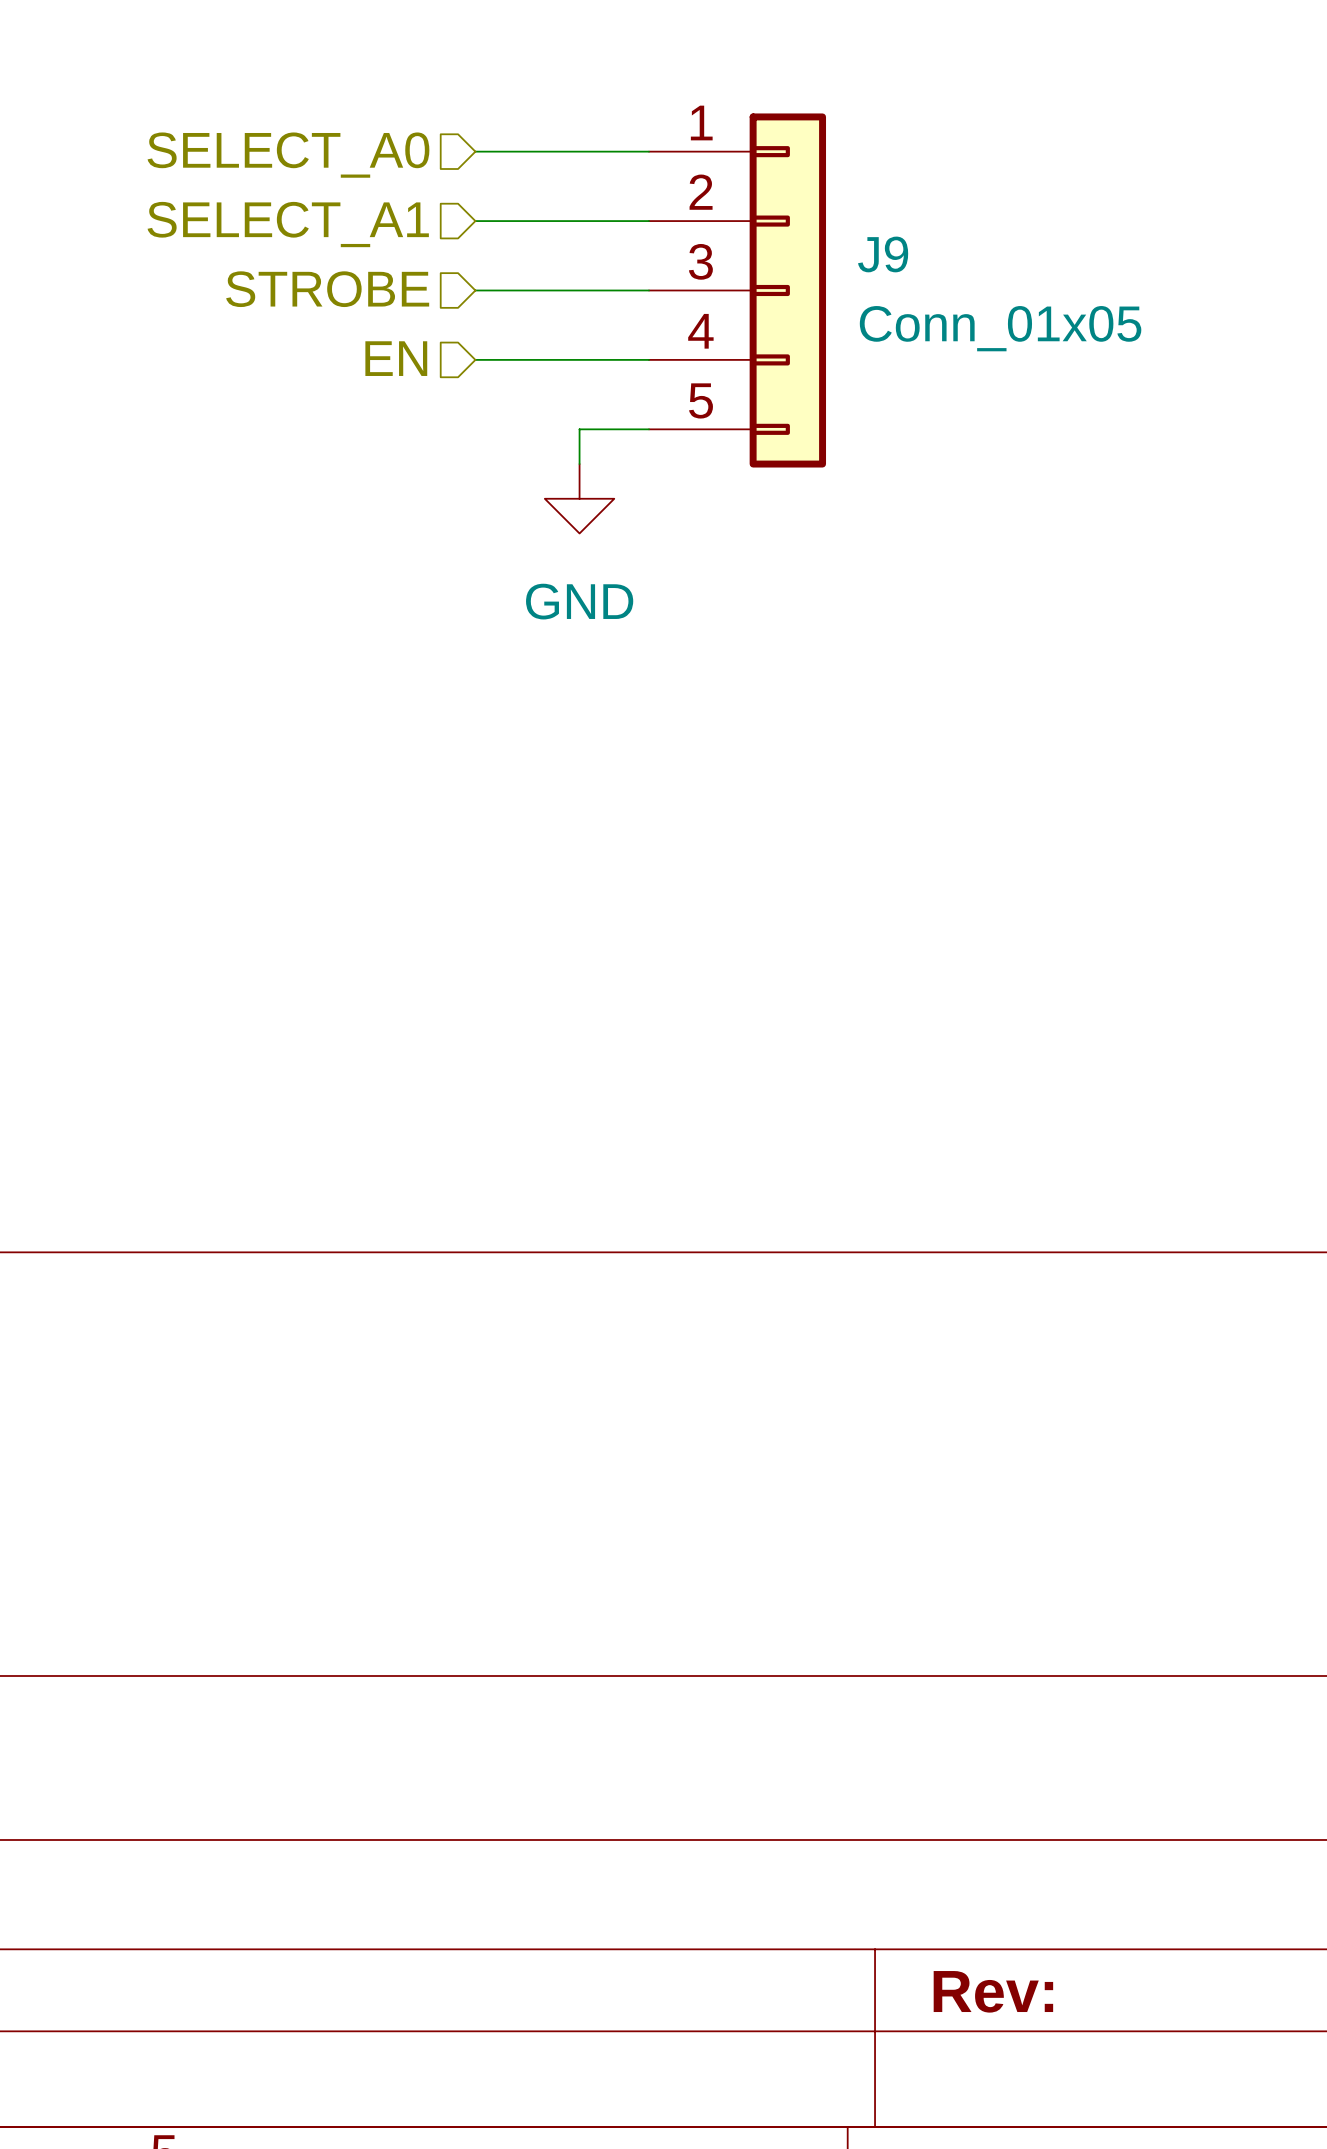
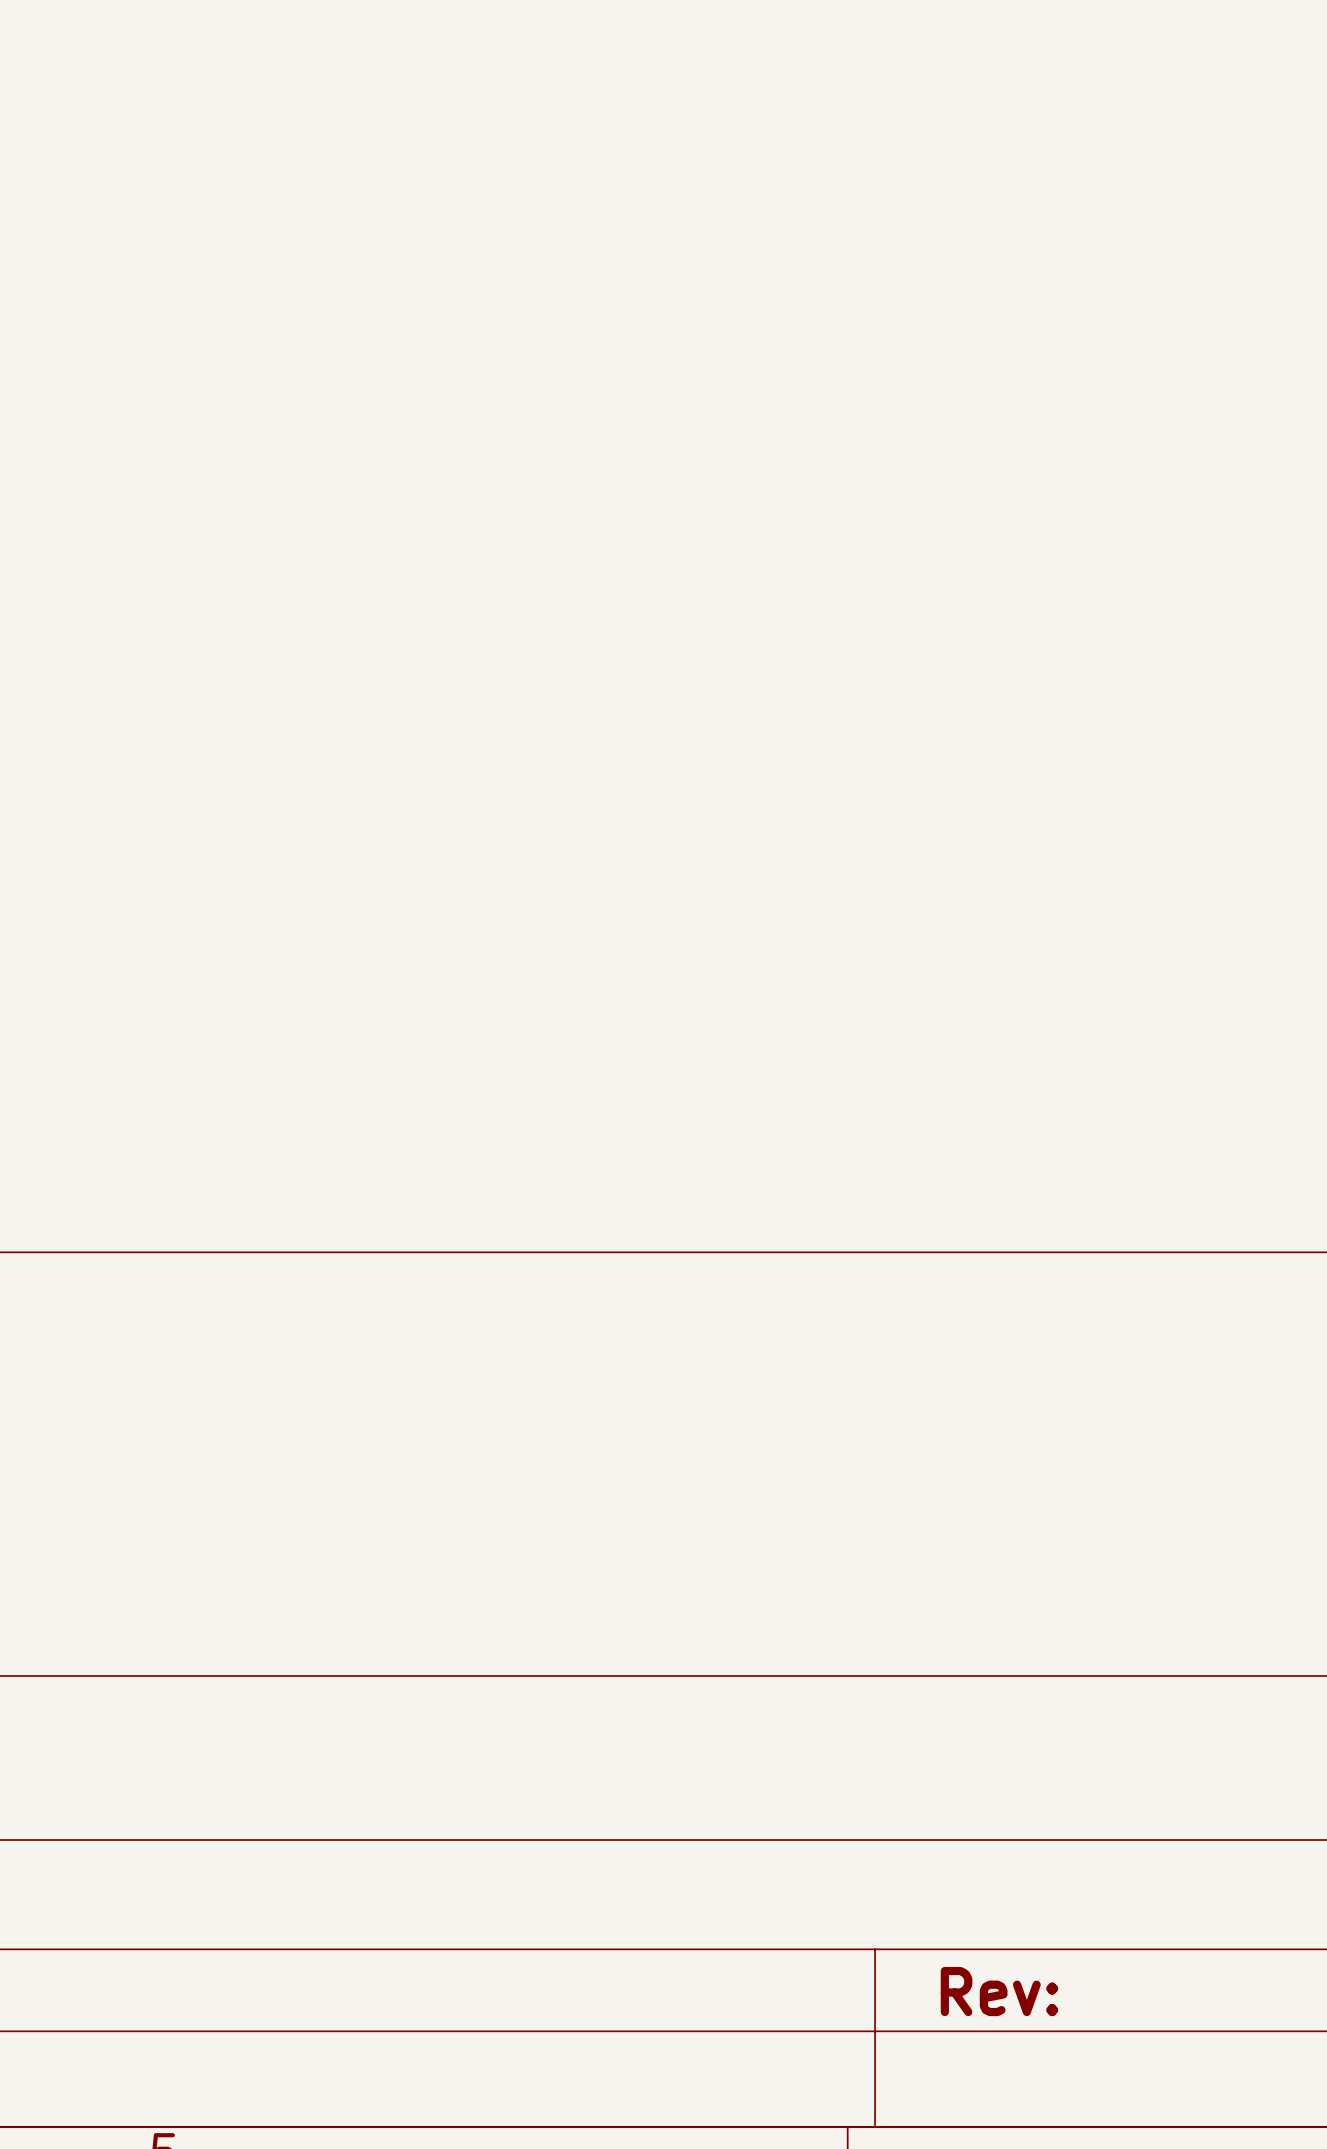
wire: (475, 151) (648, 151) -> none
hierarchical label: SELECT_A0 (288, 155) -> none
wire: (475, 221) (648, 221) -> none
hierarchical label: SELECT_A1 (288, 224) -> none
hierarchical label: STROBE (327, 289) -> none
wire: (475, 290) (648, 290) -> none
J9: Conn_01x05 (737, 290) -> none
hierarchical label: EN (396, 358) -> none
wire: (475, 359) (648, 359) -> none
wire: (648, 429) (579, 429) (579, 464) -> none
power symbol: GND (579, 498) -> none

